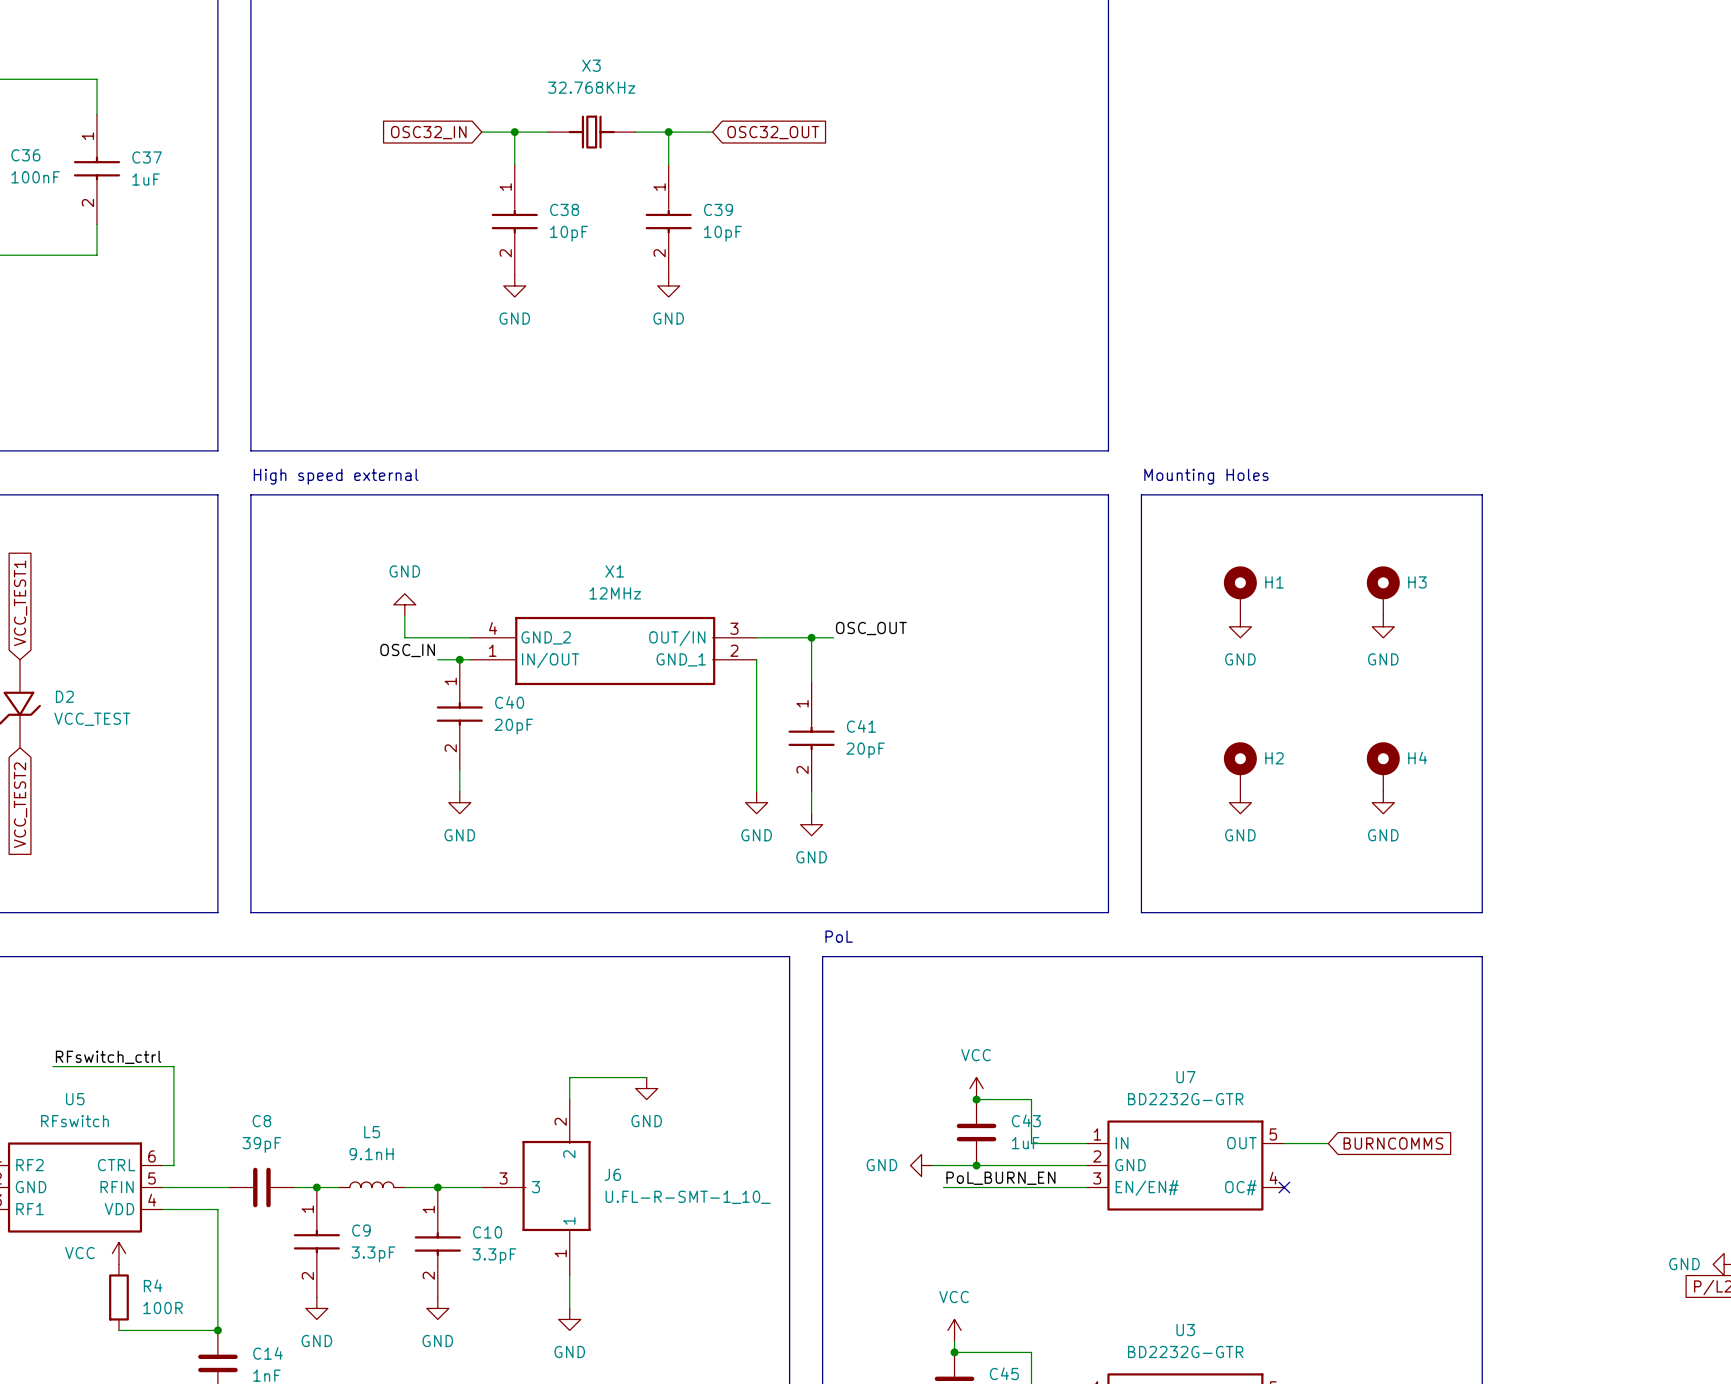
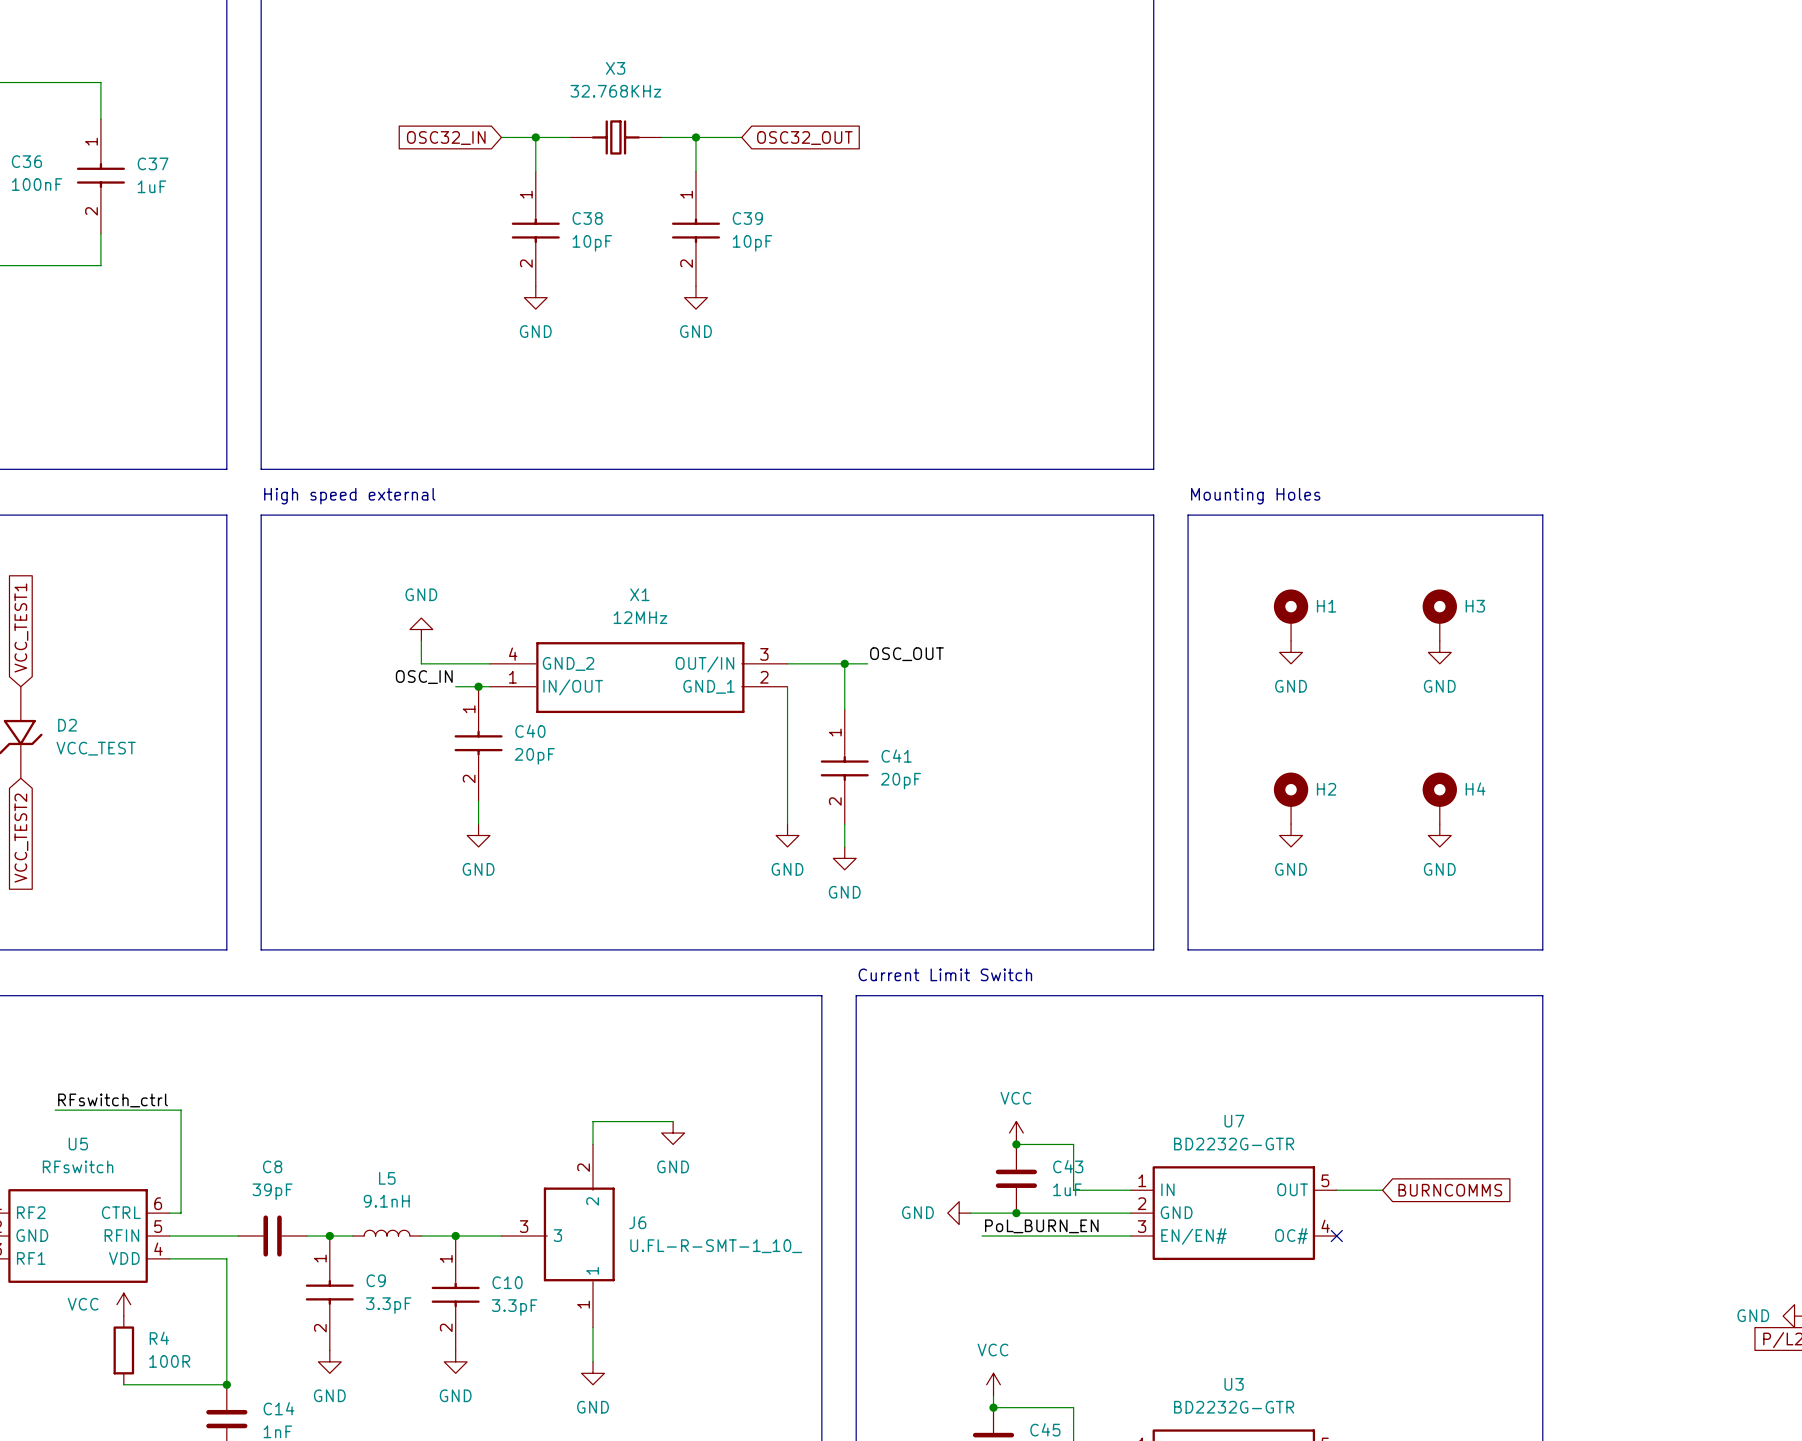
text: PoL (839, 936) -> Current Limit Switch (945, 974)

